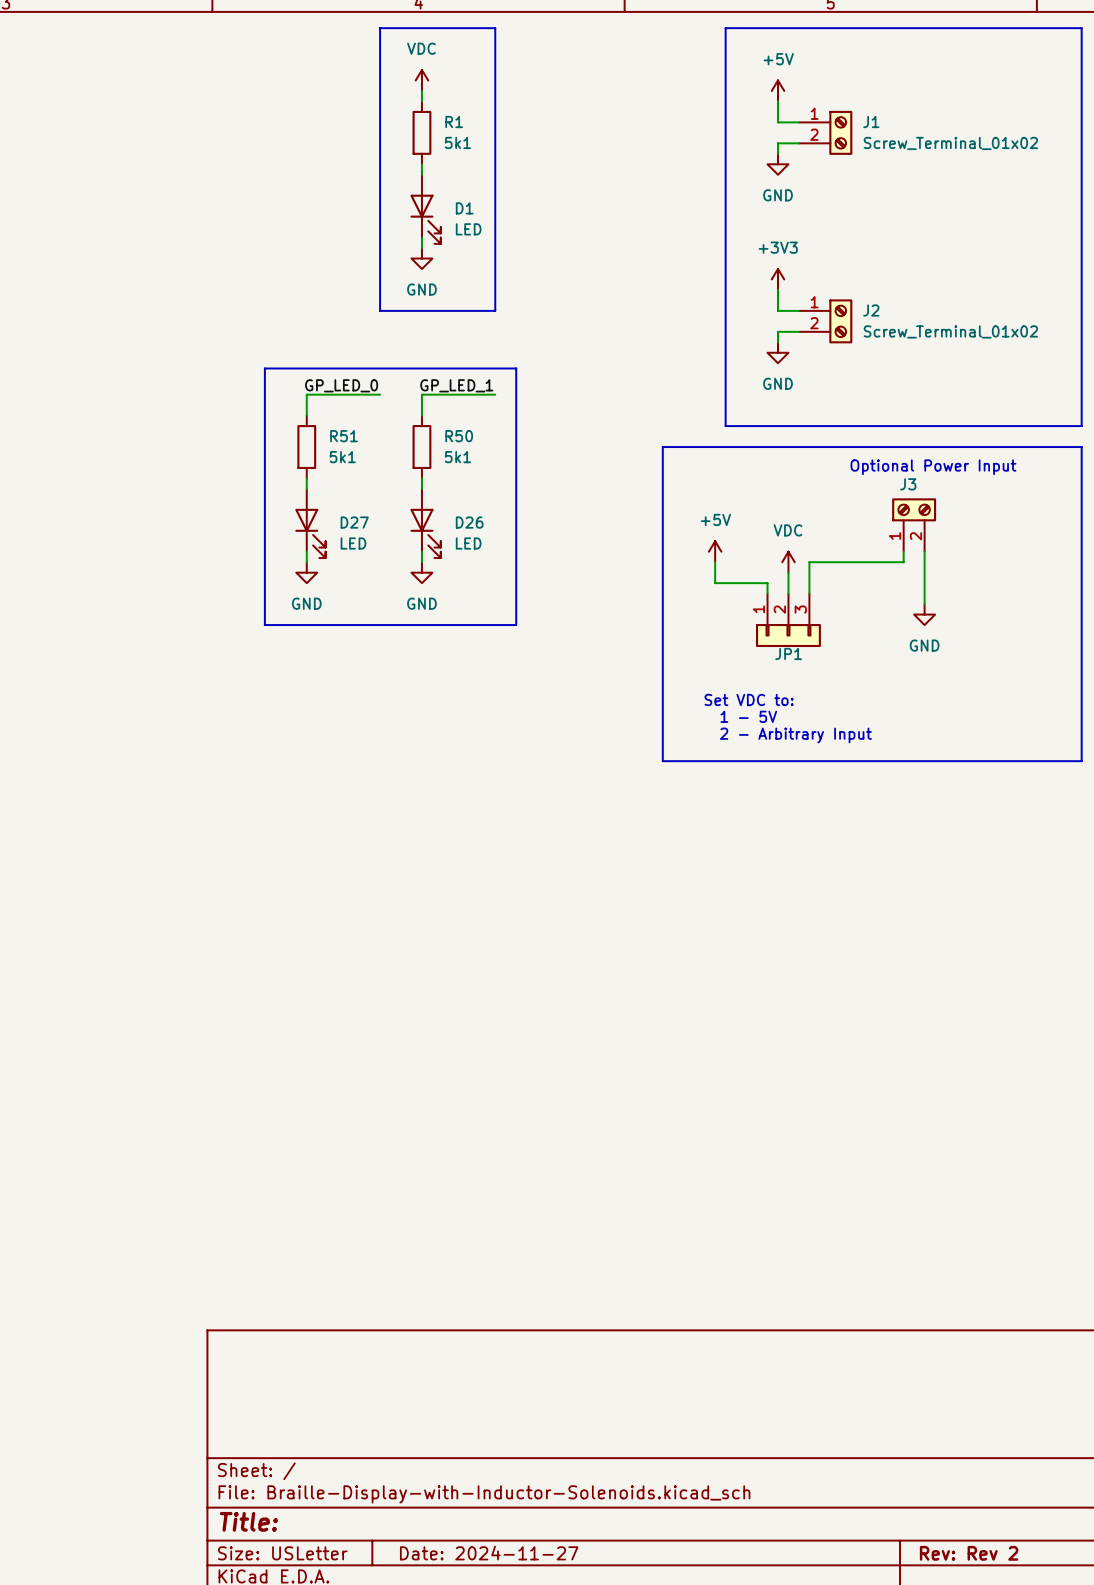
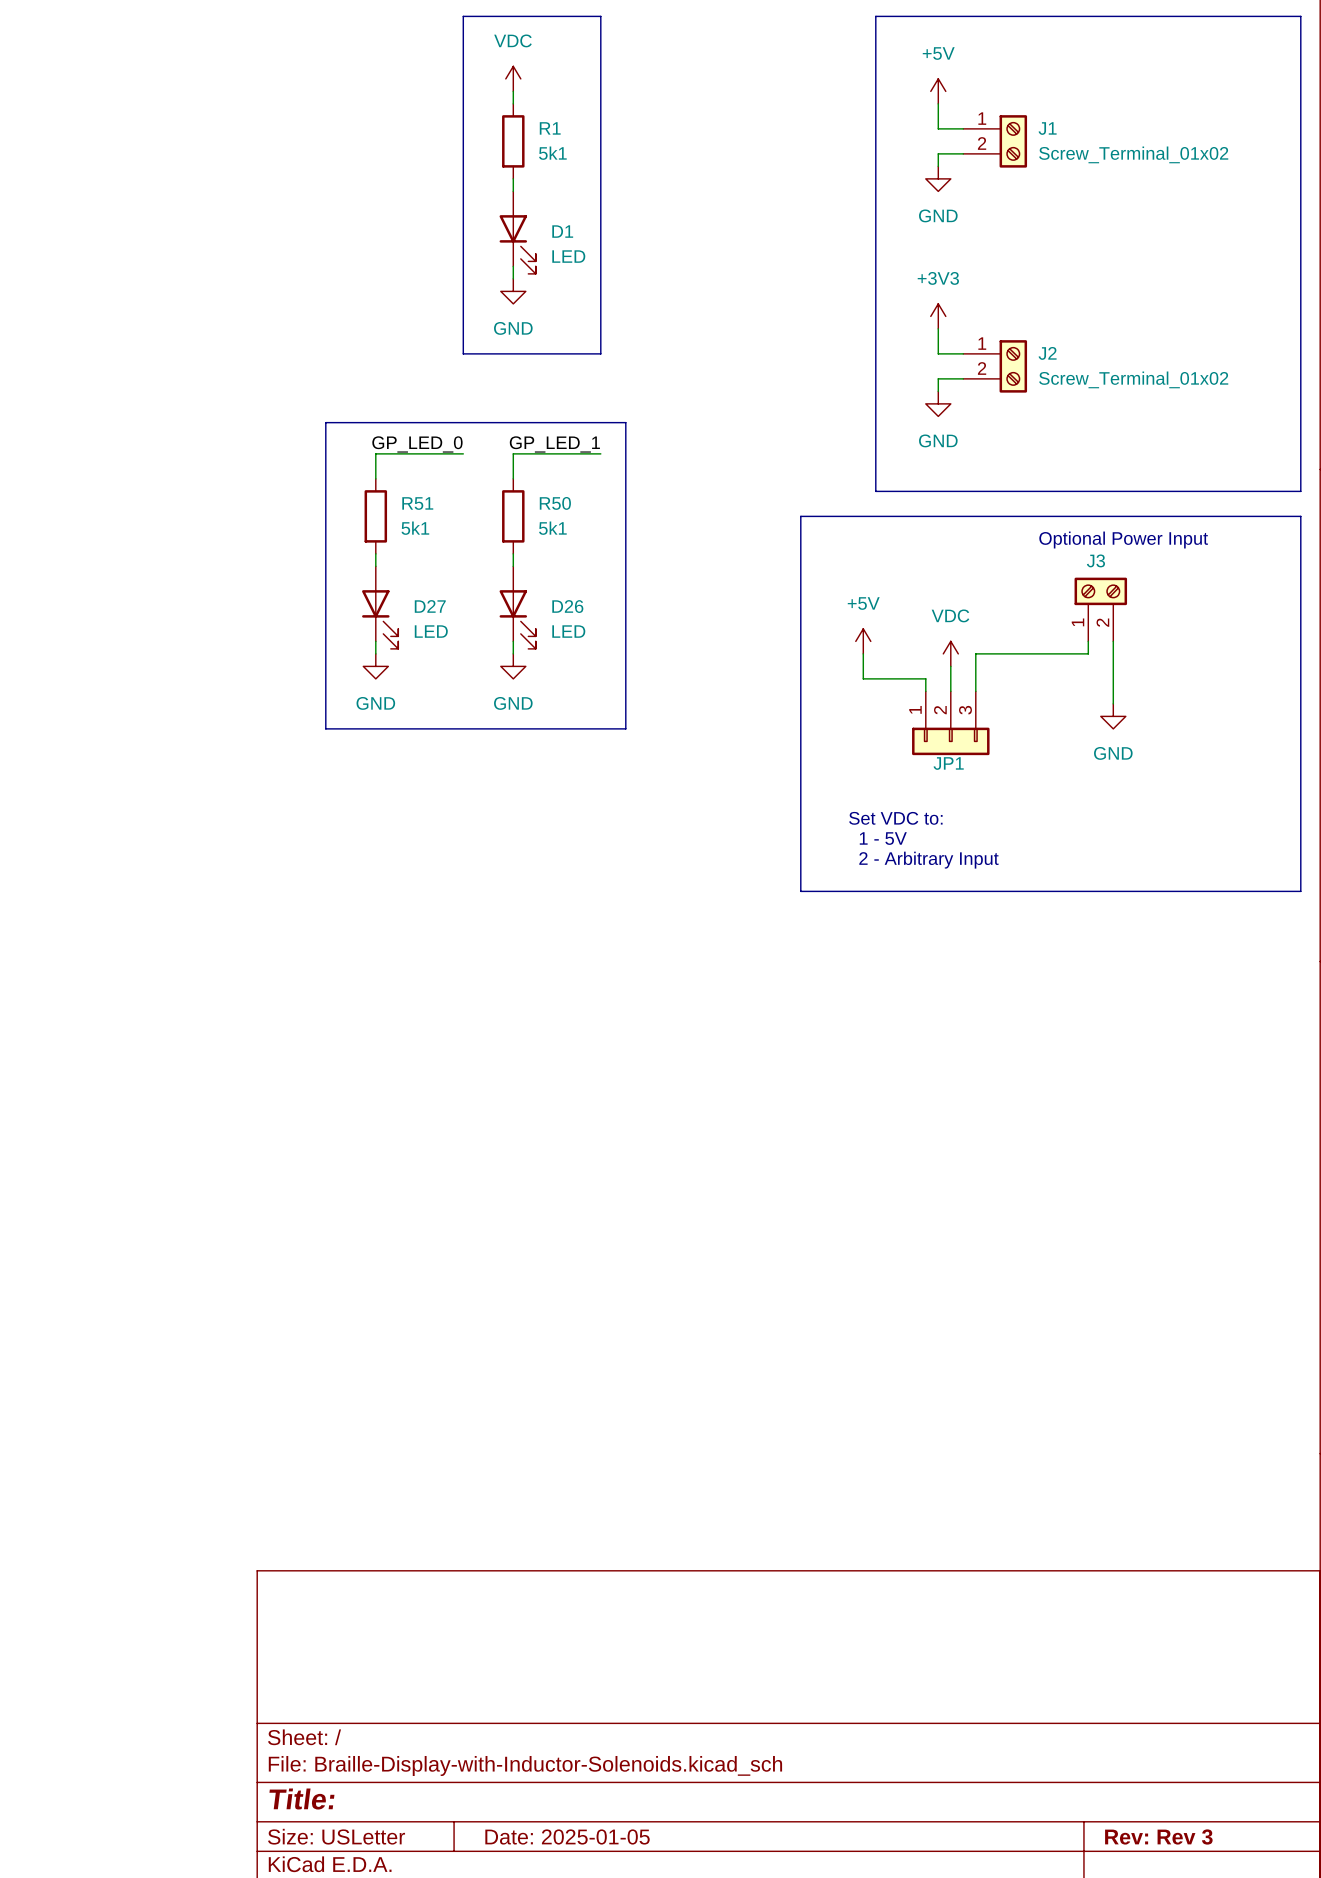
title block: Date: 2024-11-27 (489, 1553) -> Date: 2025-01-05 (567, 1836)
title block: Rev: Rev 2 (969, 1553) -> Rev: Rev 3 (1158, 1837)

